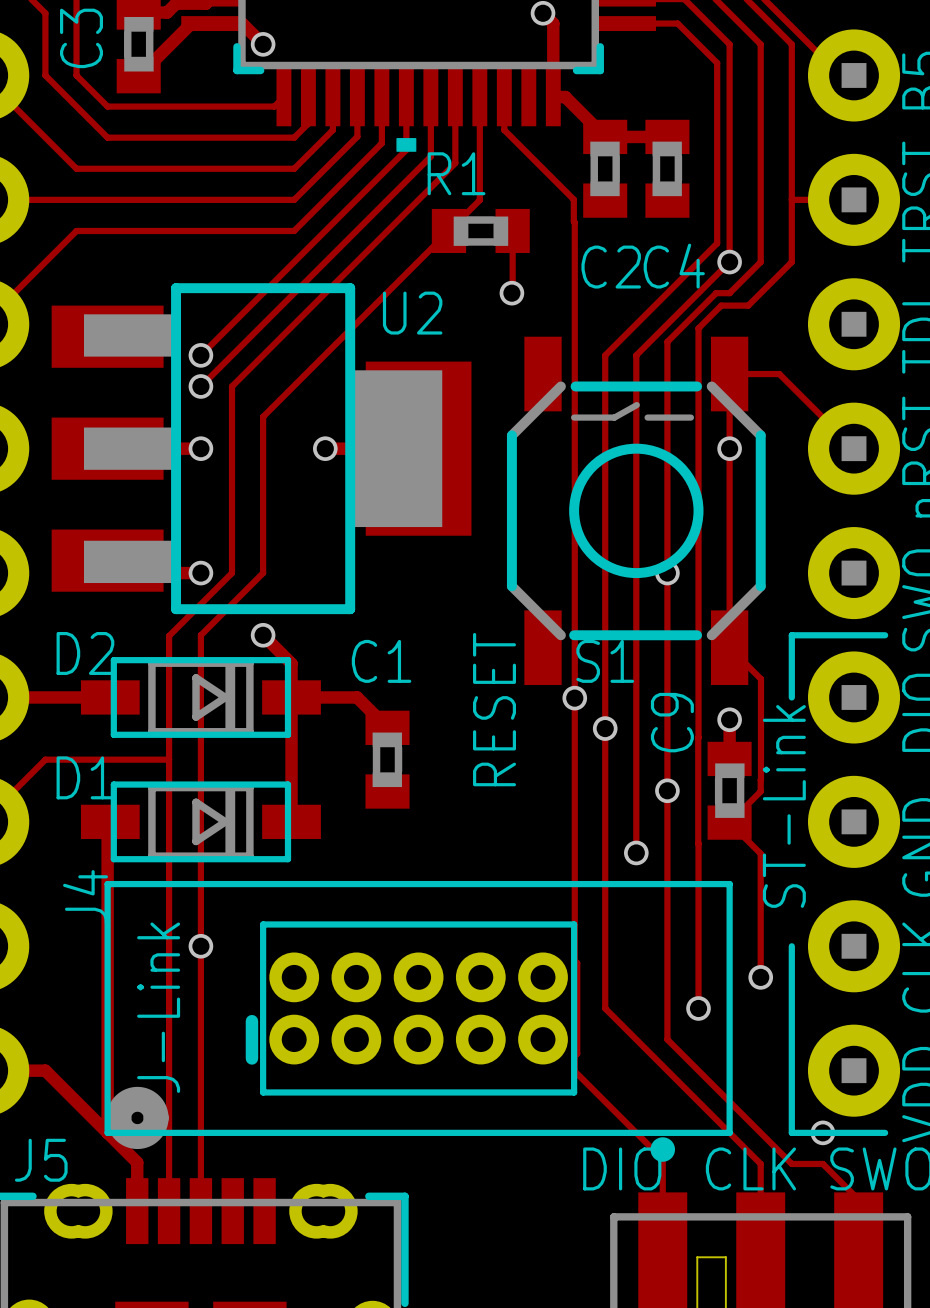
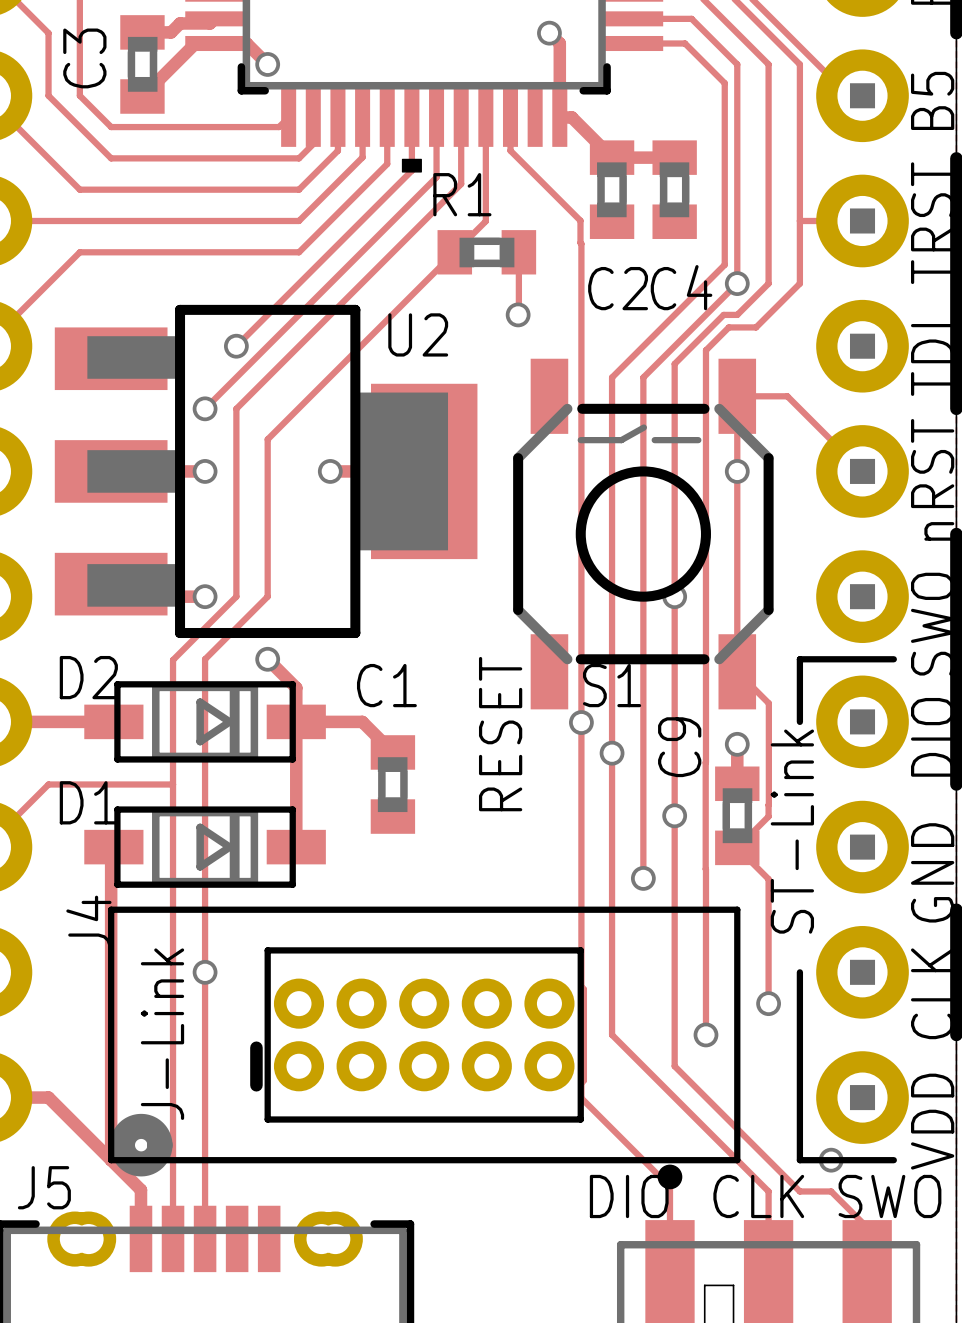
track: (232, 324) (200, 355) -> none
via position: (200, 355) -> (236, 346)

